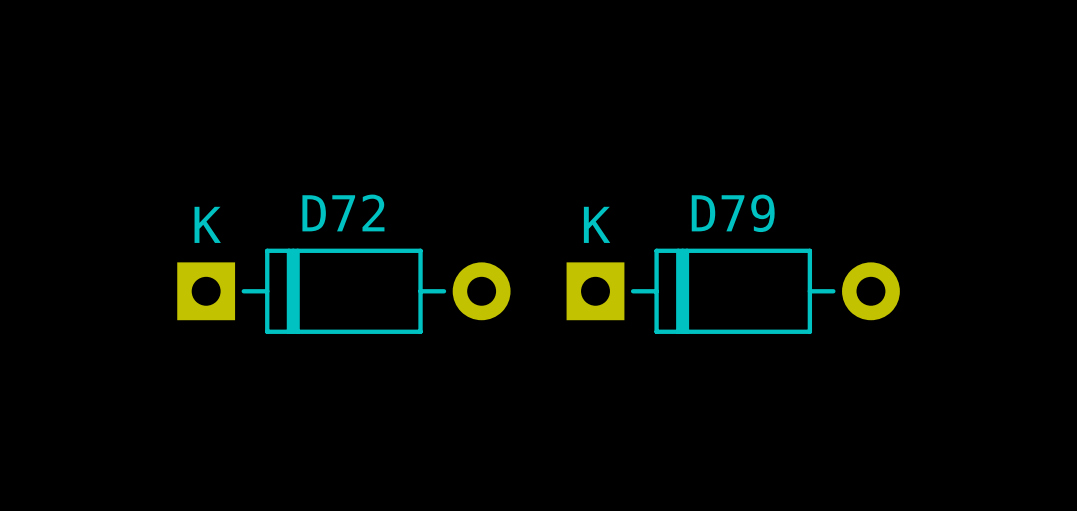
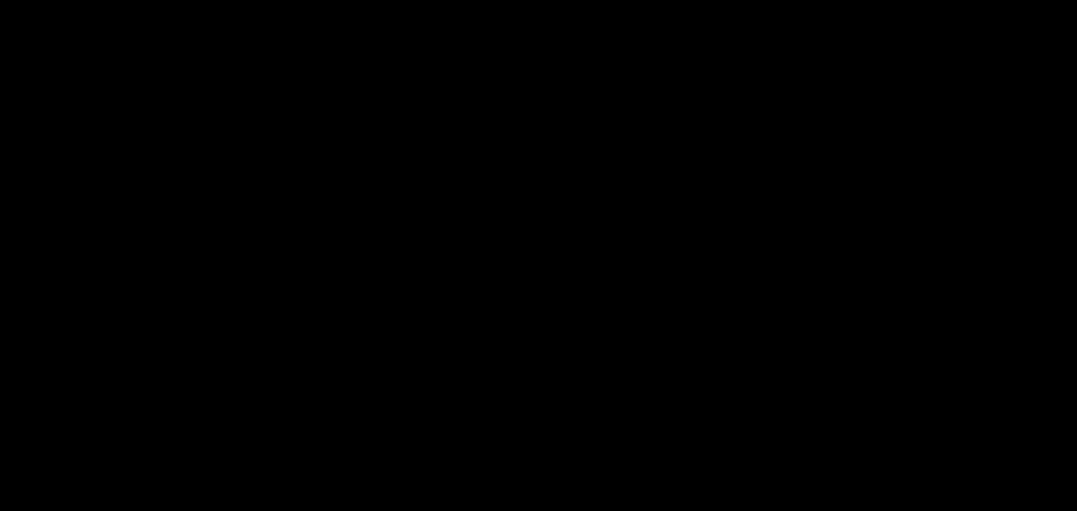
D72: (343, 291) -> none
D79: (733, 291) -> none

